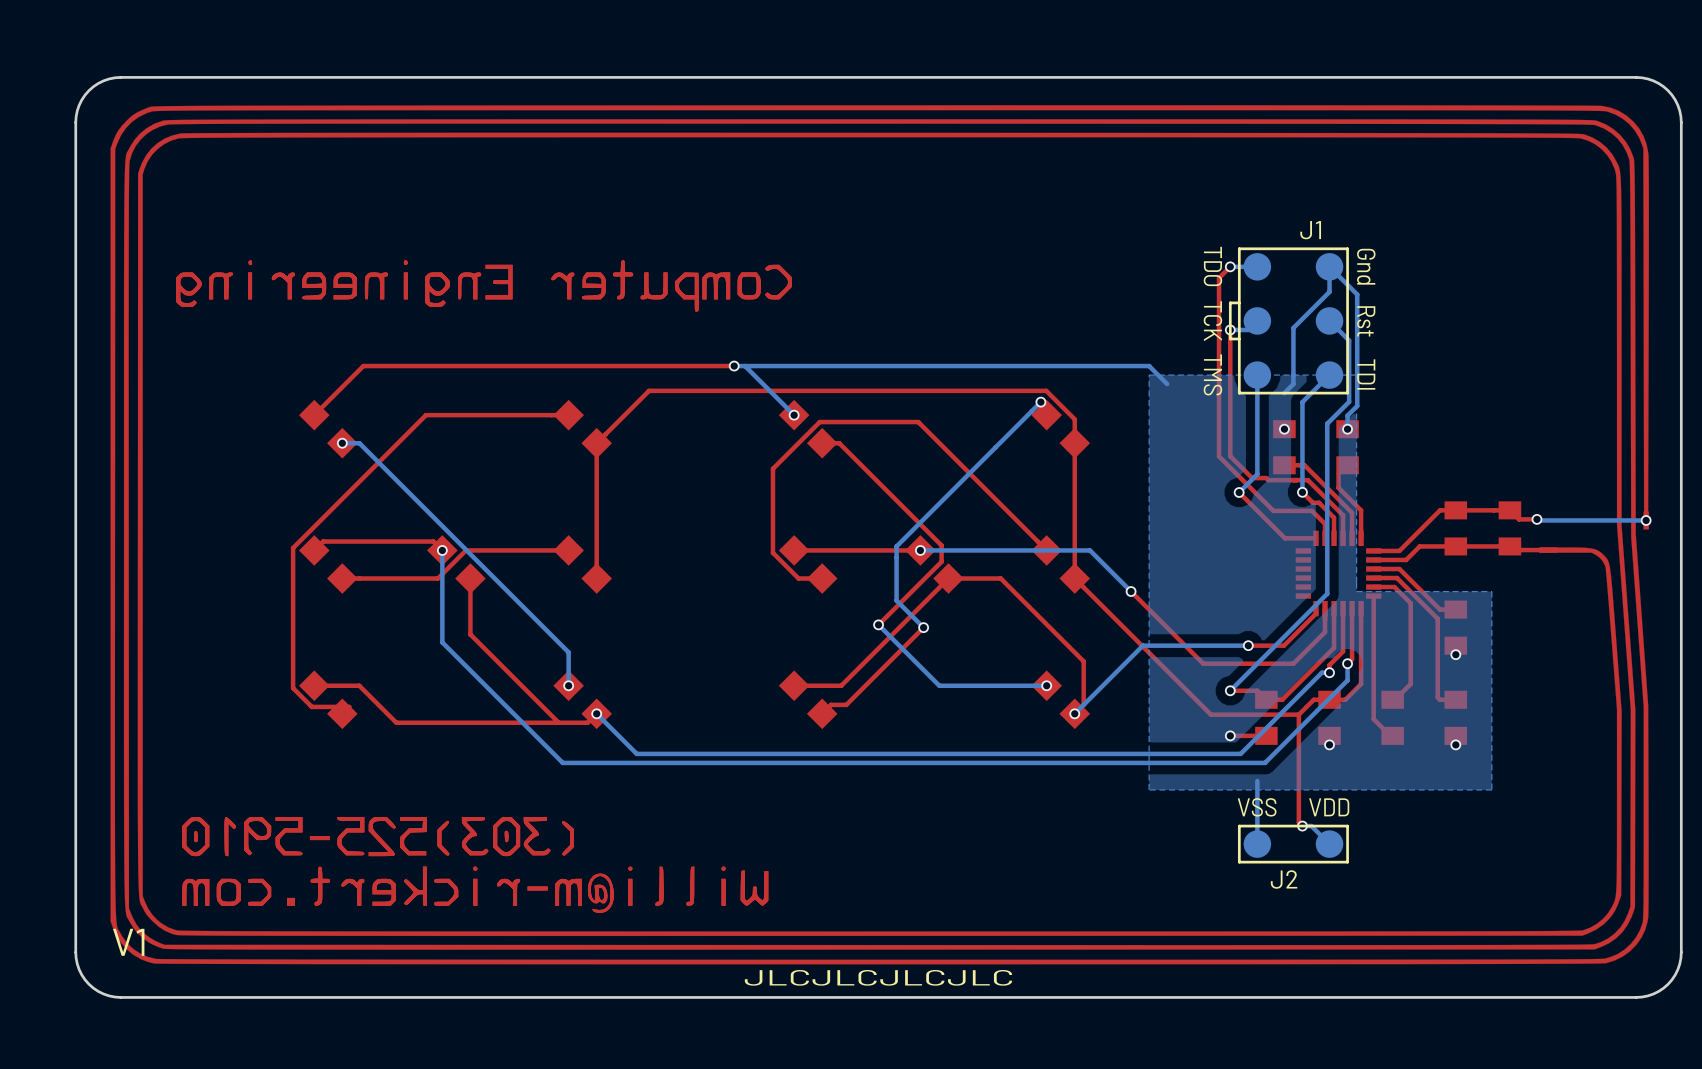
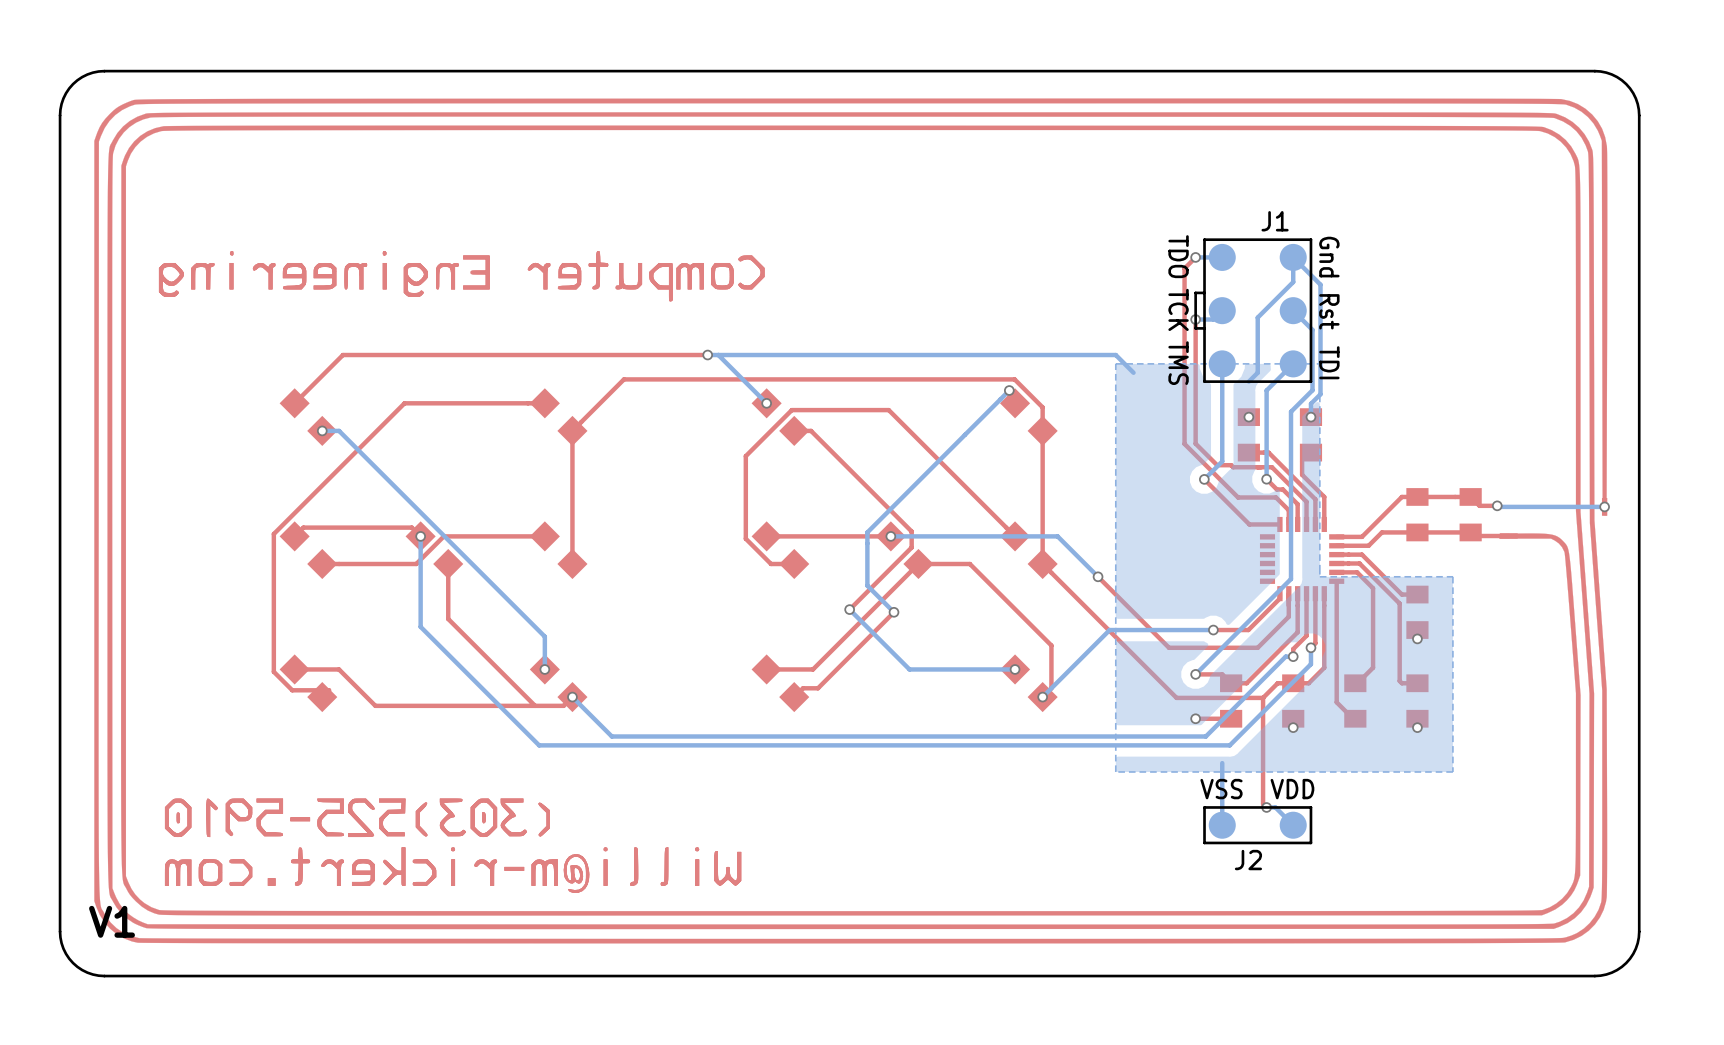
text: JLCJLCJLCJLC (878, 977) -> none

